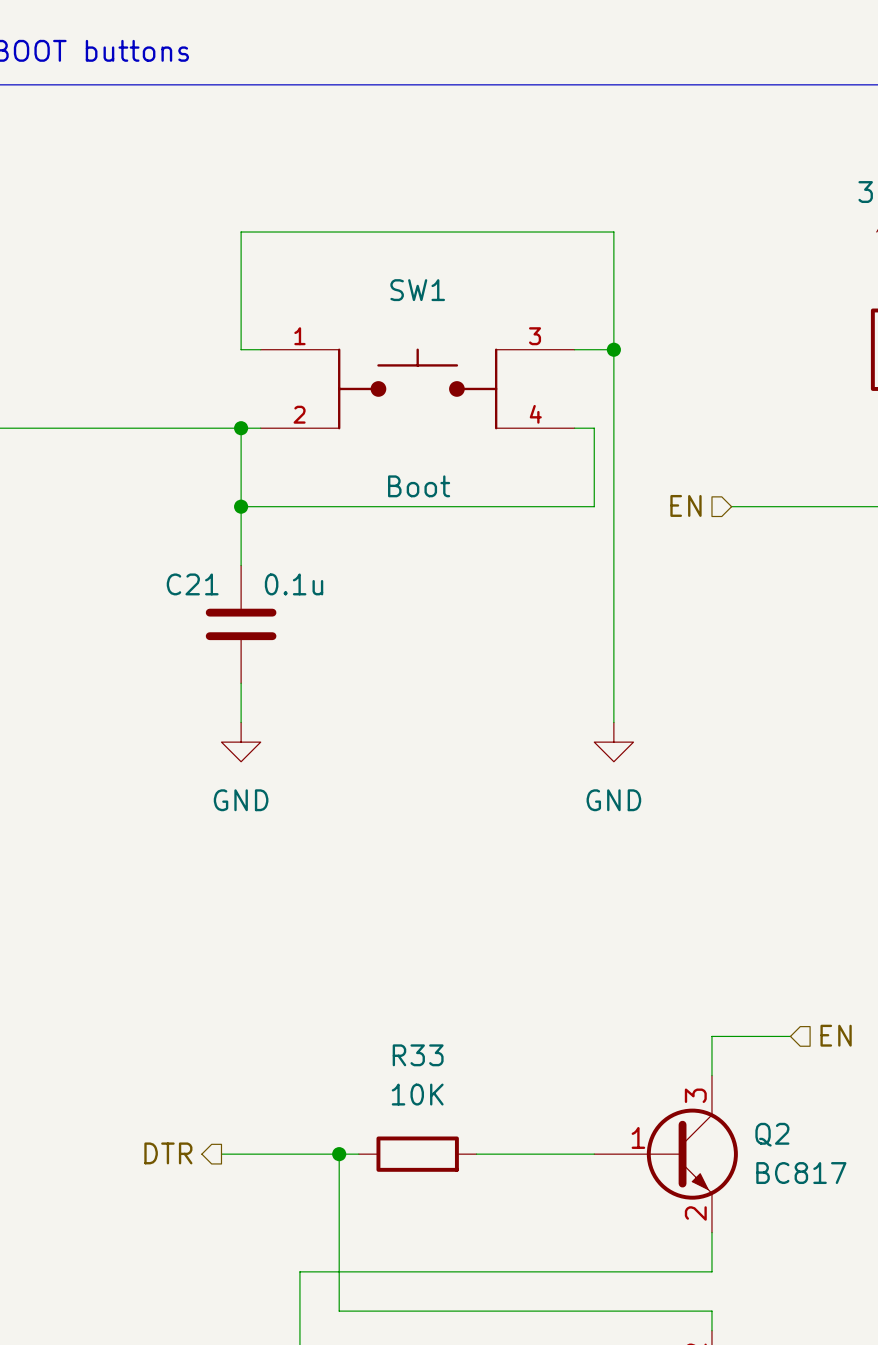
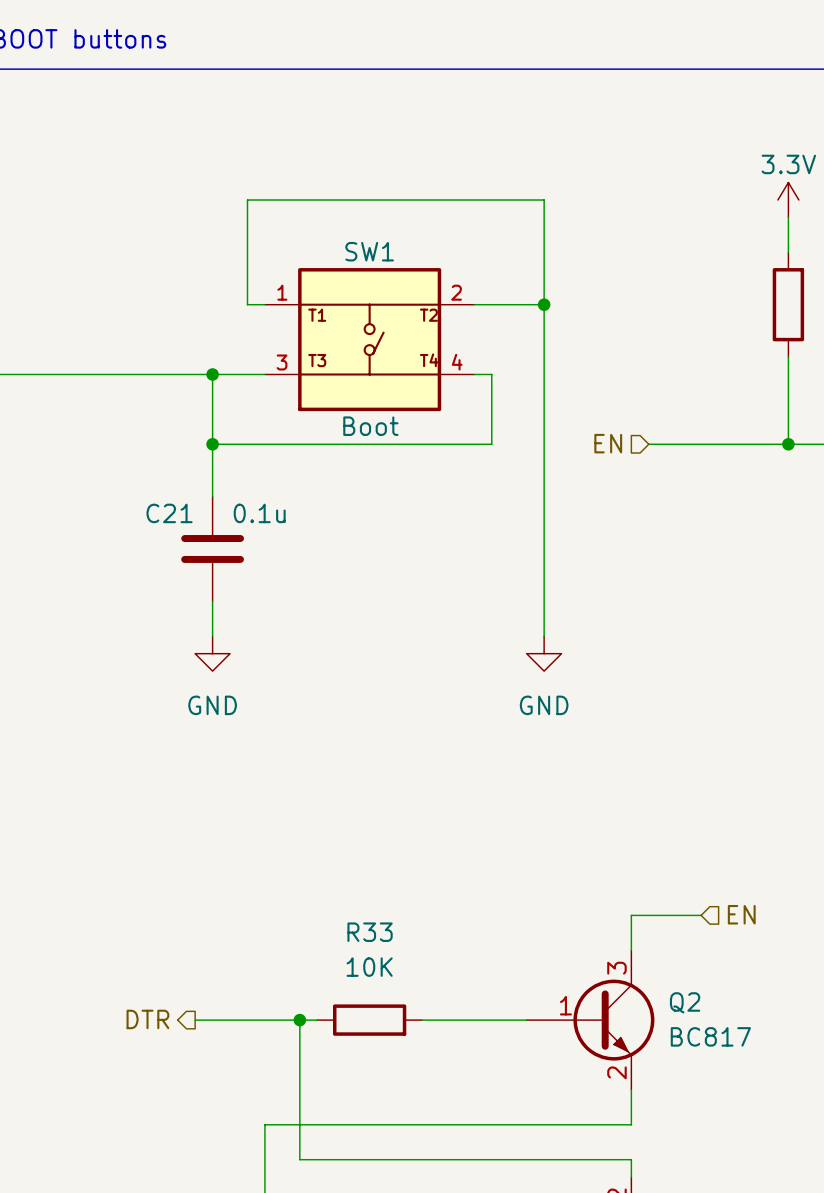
wire: (280, 232) (241, 232) (241, 349) (260, 349) -> (247, 200) (247, 304) (264, 304)
SW1 symbol: [260, 348, 575, 430] -> [264, 268, 475, 412]
wire: (574, 428) (594, 428) (594, 506) (555, 506) -> (474, 374) (491, 374) (491, 444)

